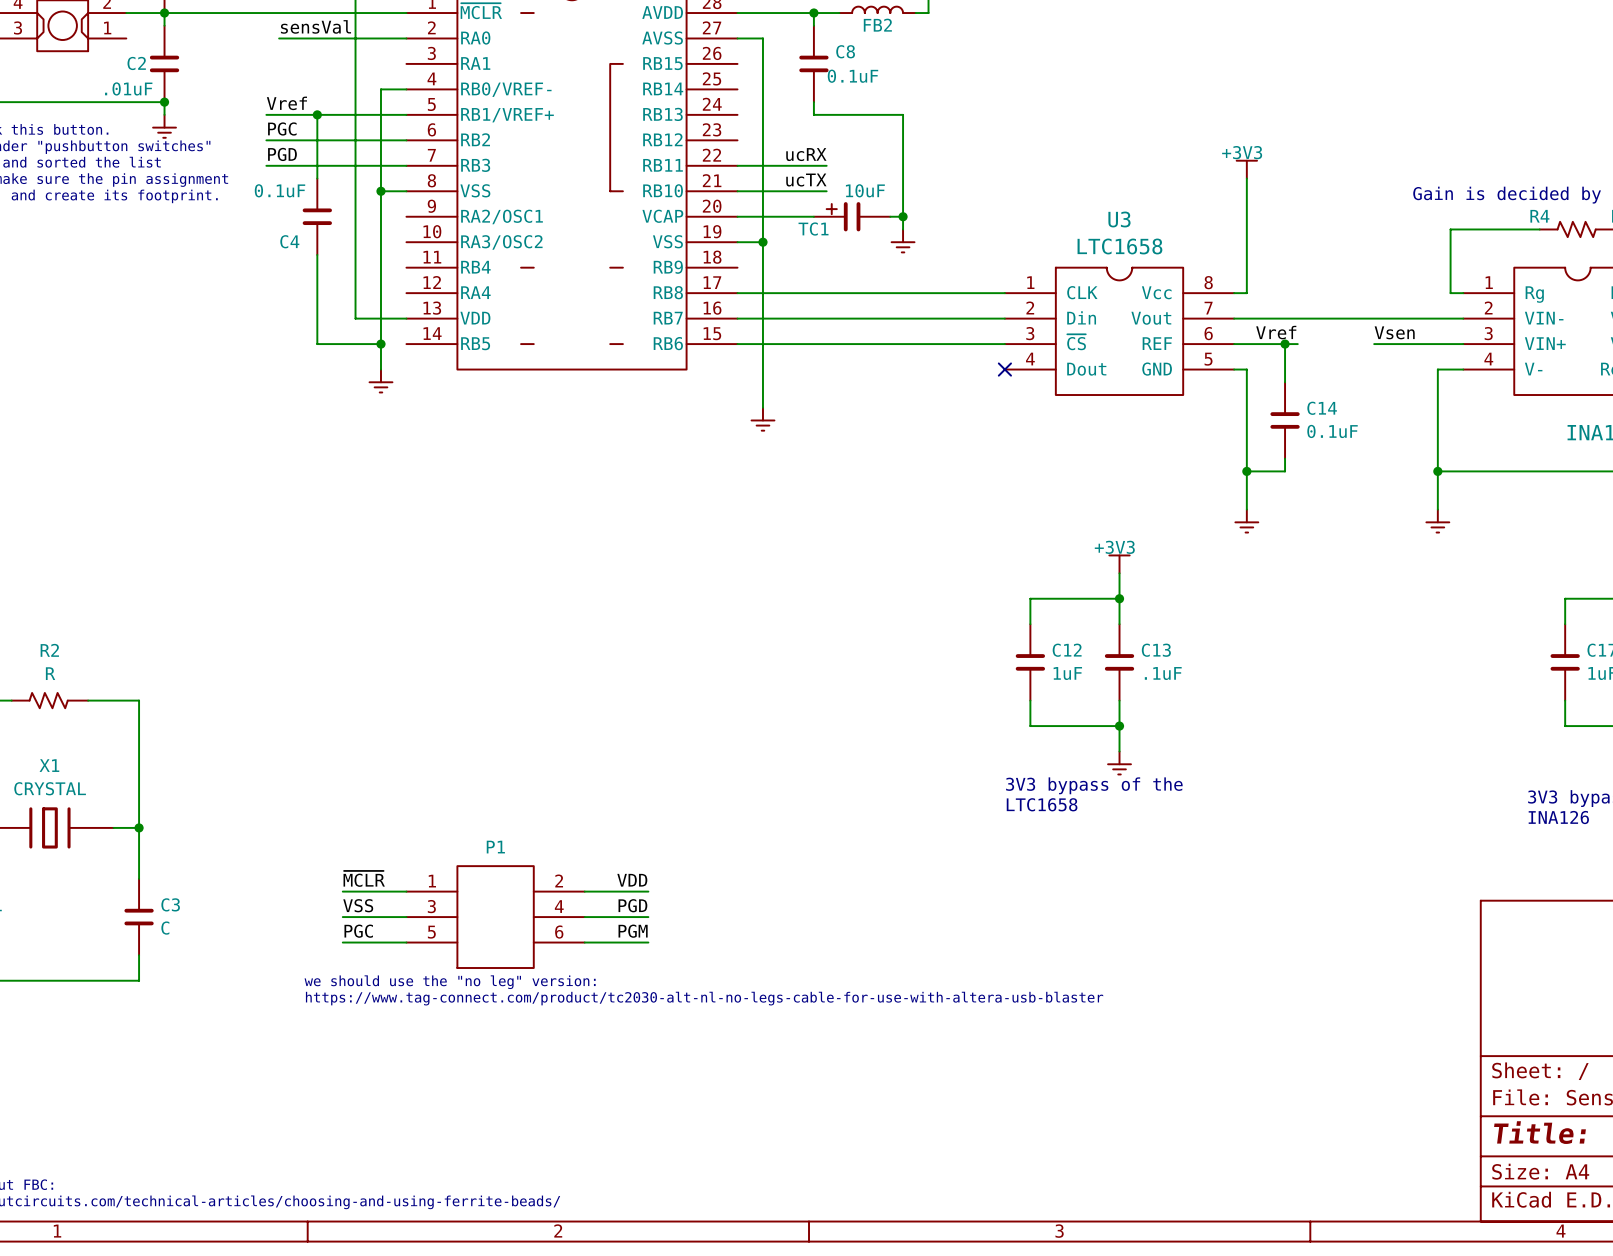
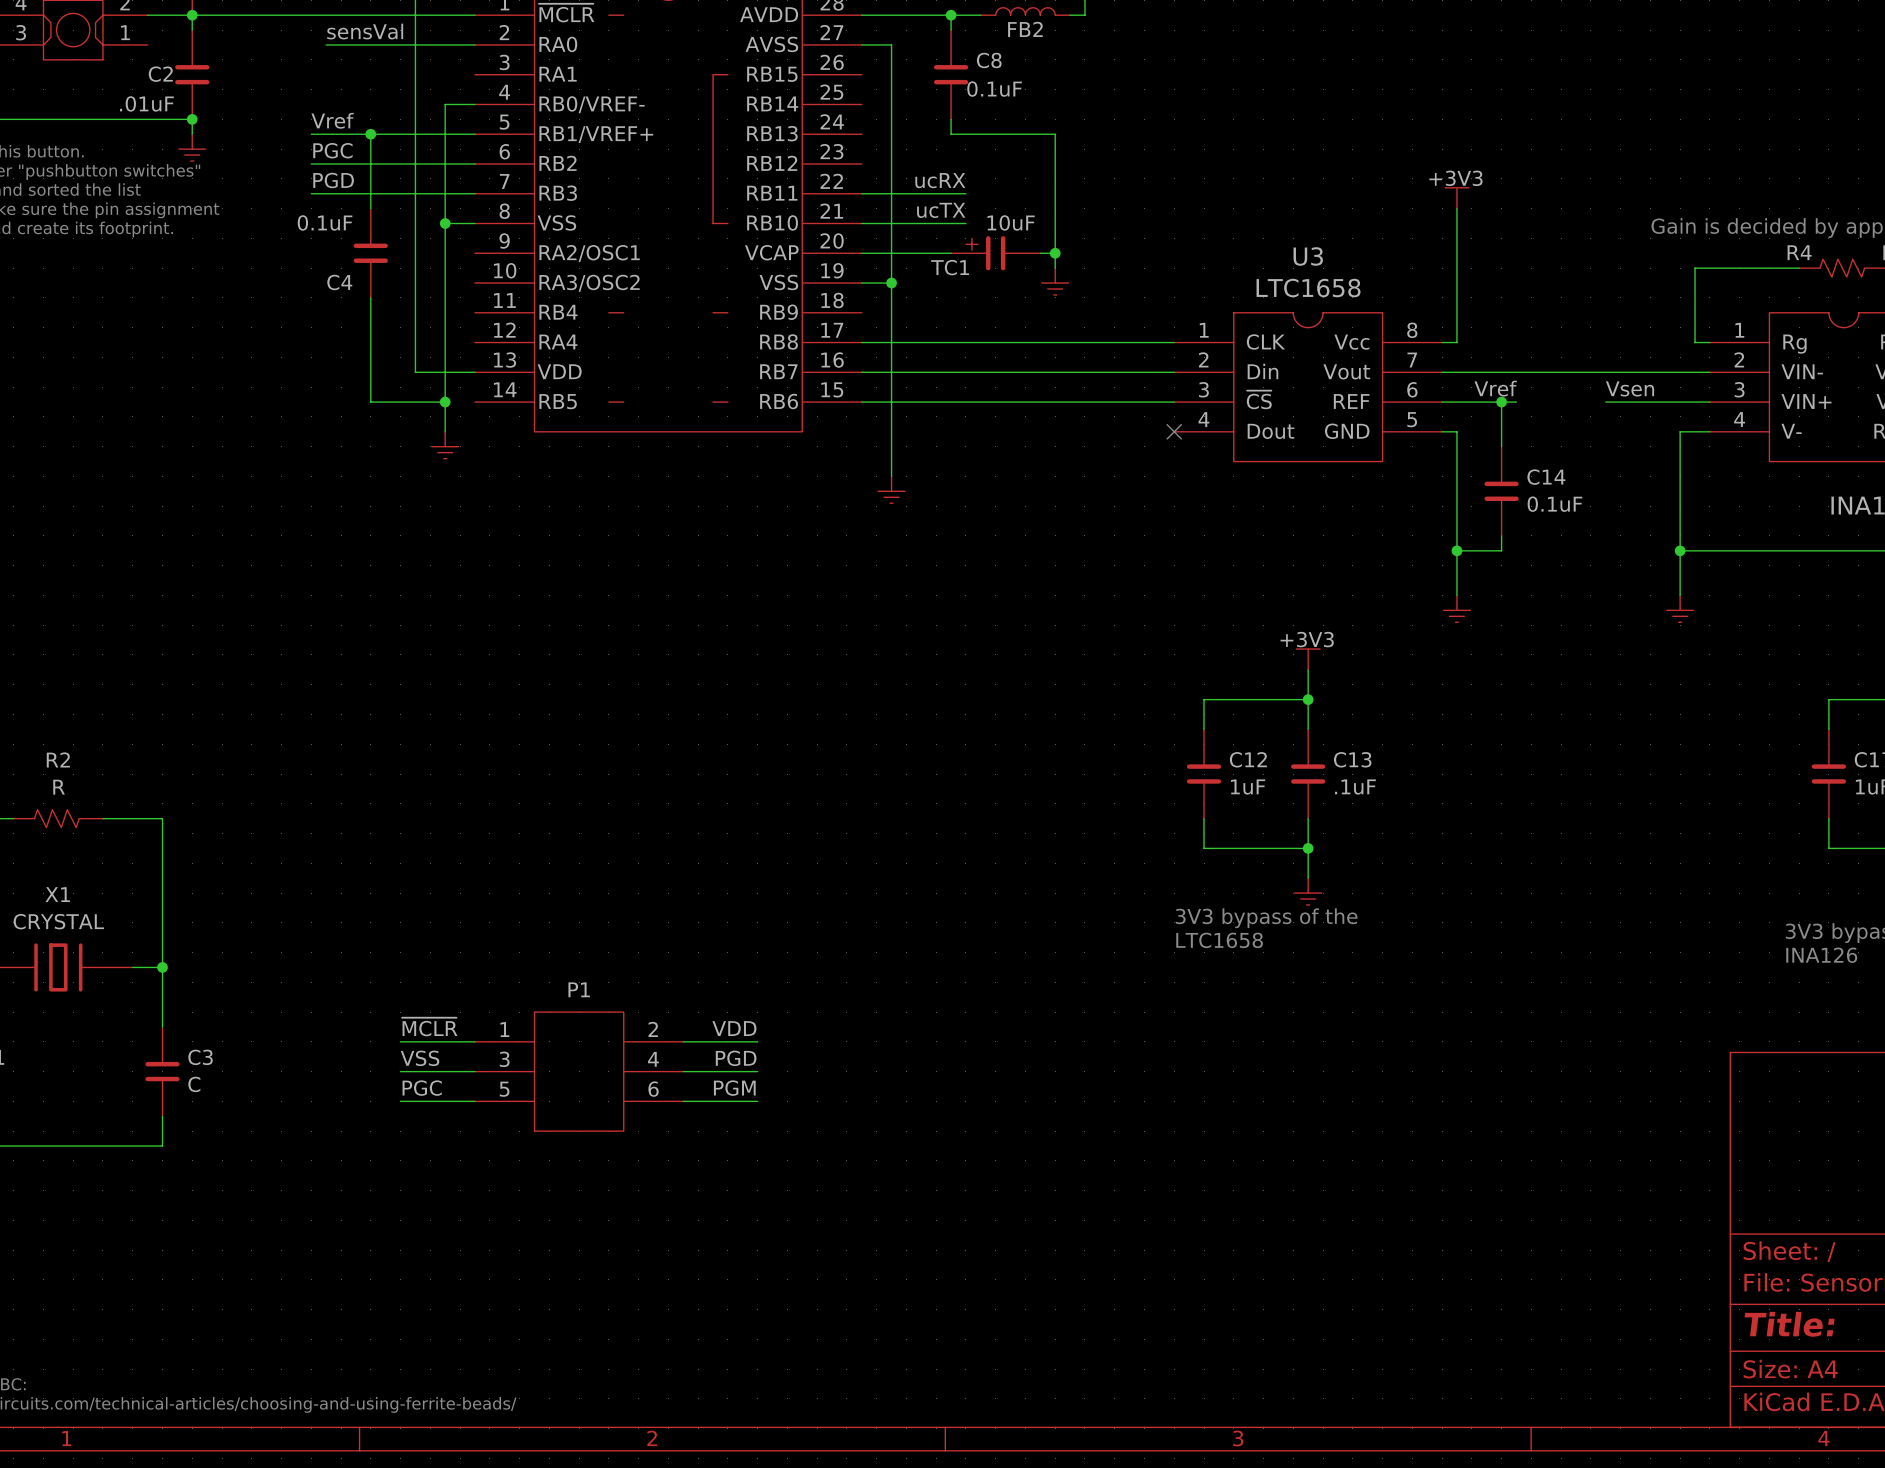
text: we should use the "no leg" version: (450, 982) -> none
text: https://www.tag-connect.com/product/tc2030-alt-nl-no-legs-cable-for-use-with-altera-usb-blaster (704, 998) -> none

